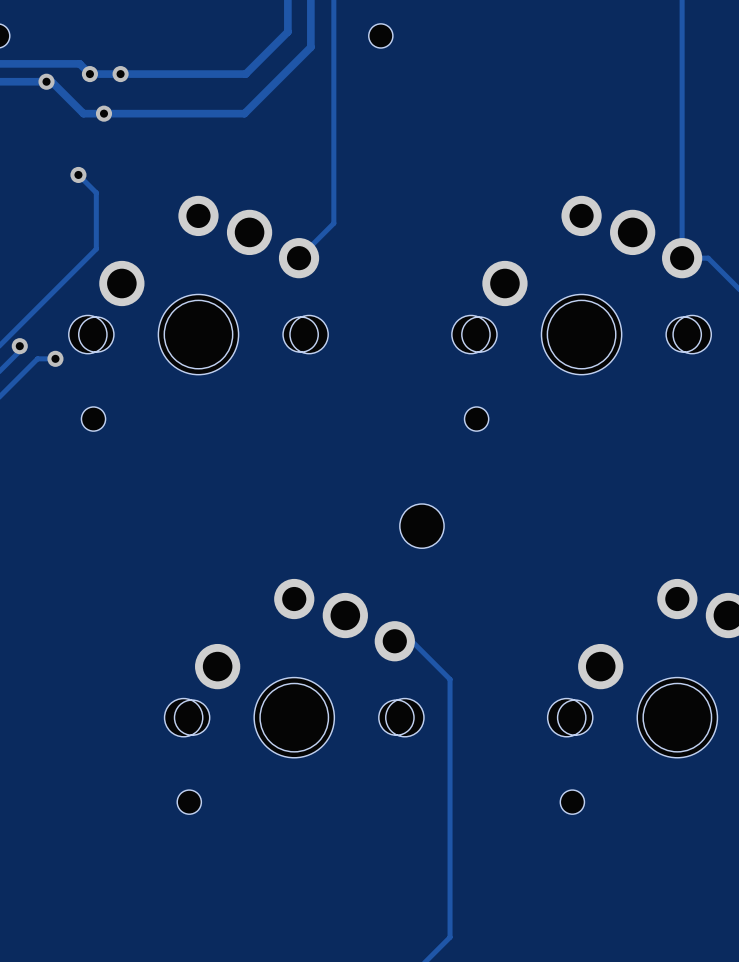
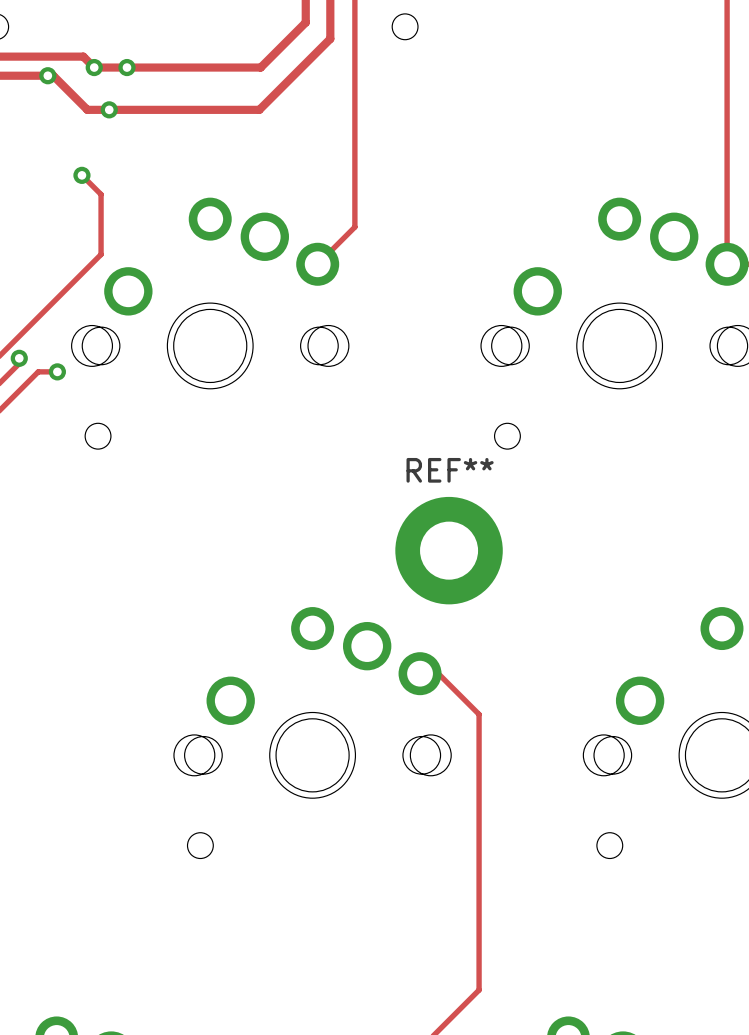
part: (421, 526) -> none
REF**: none -> (449, 550)

